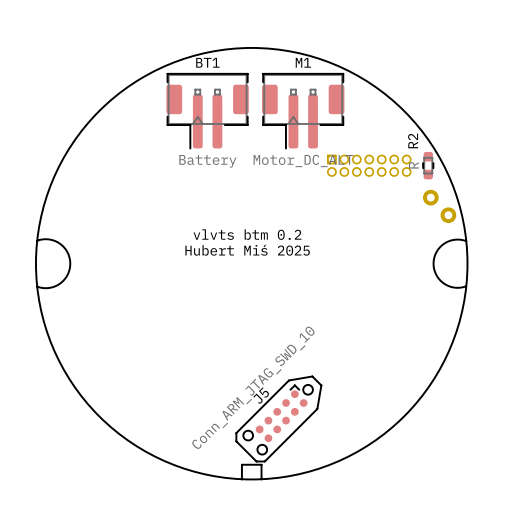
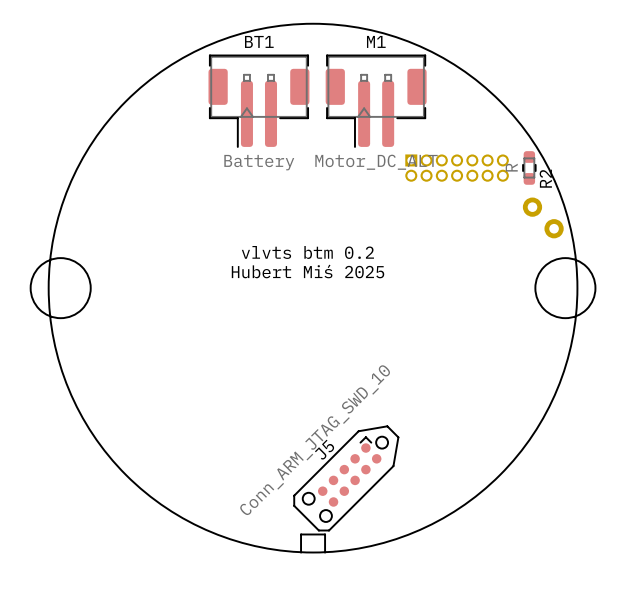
R2 name position: R2 (413, 140) -> R2 (545, 178)
round board edge: none -> [30, 257, 92, 319]
round board edge: none -> [534, 257, 597, 319]
board edge: (37, 240) (49, 239) (61, 244) (68, 254) (70, 263) (67, 275) (58, 284) (46, 288) (37, 286) -> none
board edge: (466, 241) (457, 239) (445, 242) (436, 251) (433, 263) (436, 275) (445, 284) (454, 287) (466, 286) -> none

